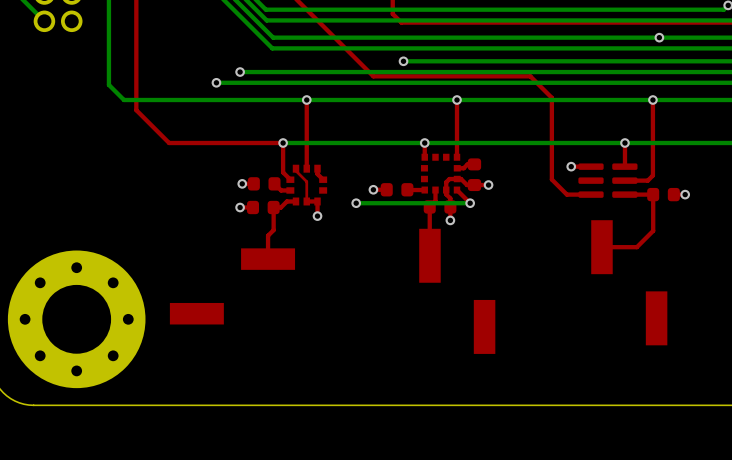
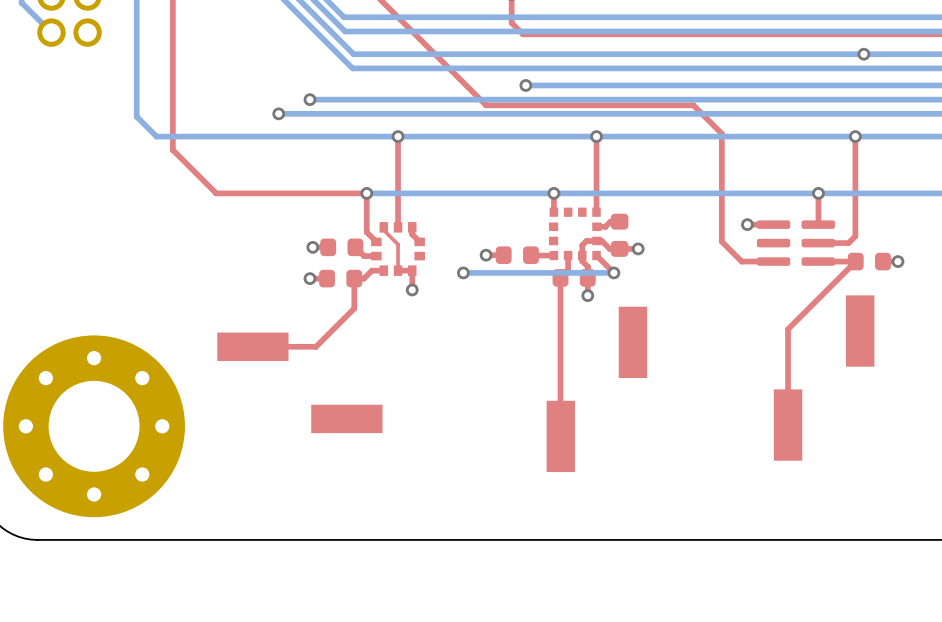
top track: (653, 194) (653, 230) (636, 247) (601, 247) -> (855, 261) (788, 329) (788, 425)
part footprint: [591, 220, 668, 346] -> [773, 295, 875, 461]
part footprint: [419, 228, 496, 354] -> [546, 306, 648, 473]
top track: (268, 235) (268, 259) -> (346, 315) (316, 346) (252, 346)
part footprint: [169, 248, 296, 325] -> [217, 332, 383, 434]
top track: none -> (560, 342) (560, 436)

